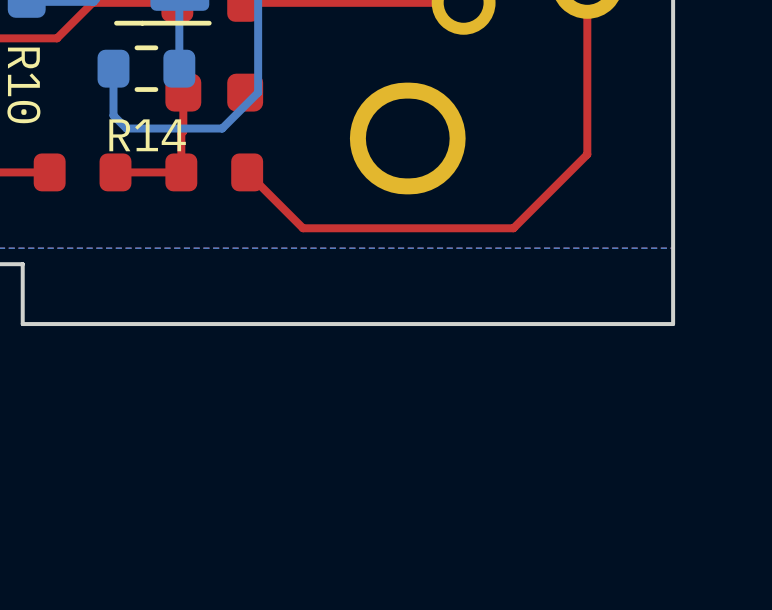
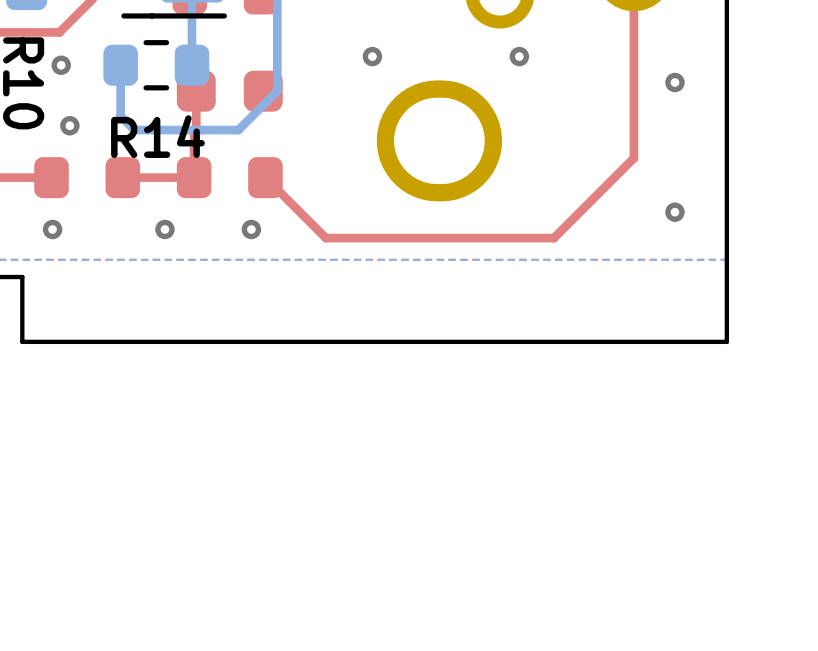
via: none -> (372, 56)
via: none -> (519, 56)
via: none -> (61, 65)
via: none -> (674, 82)
via: none -> (69, 125)
via: none -> (674, 212)
via: none -> (52, 229)
via: none -> (164, 229)
via: none -> (251, 229)

